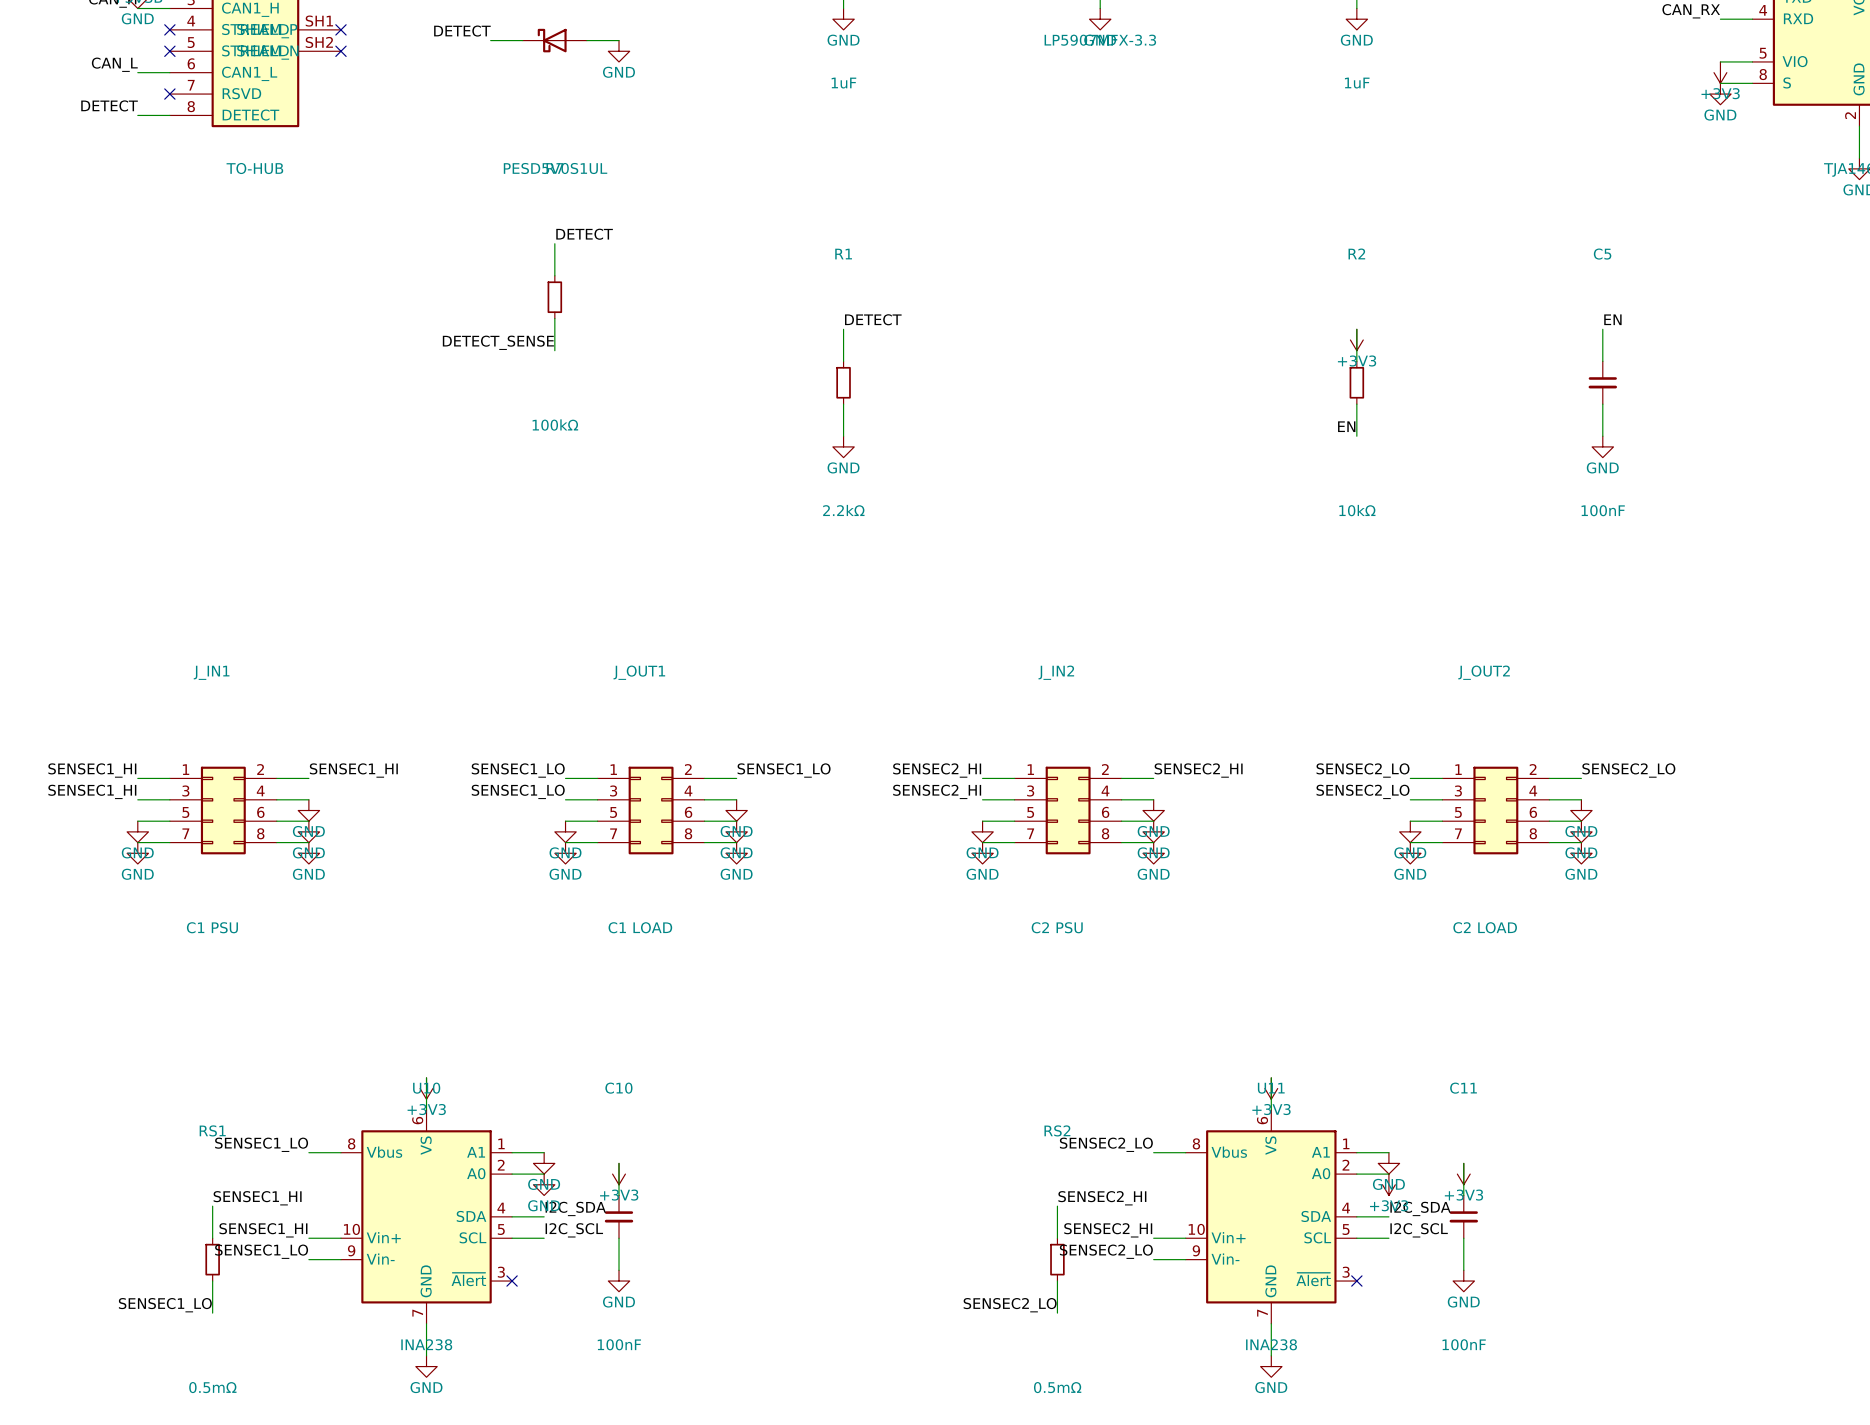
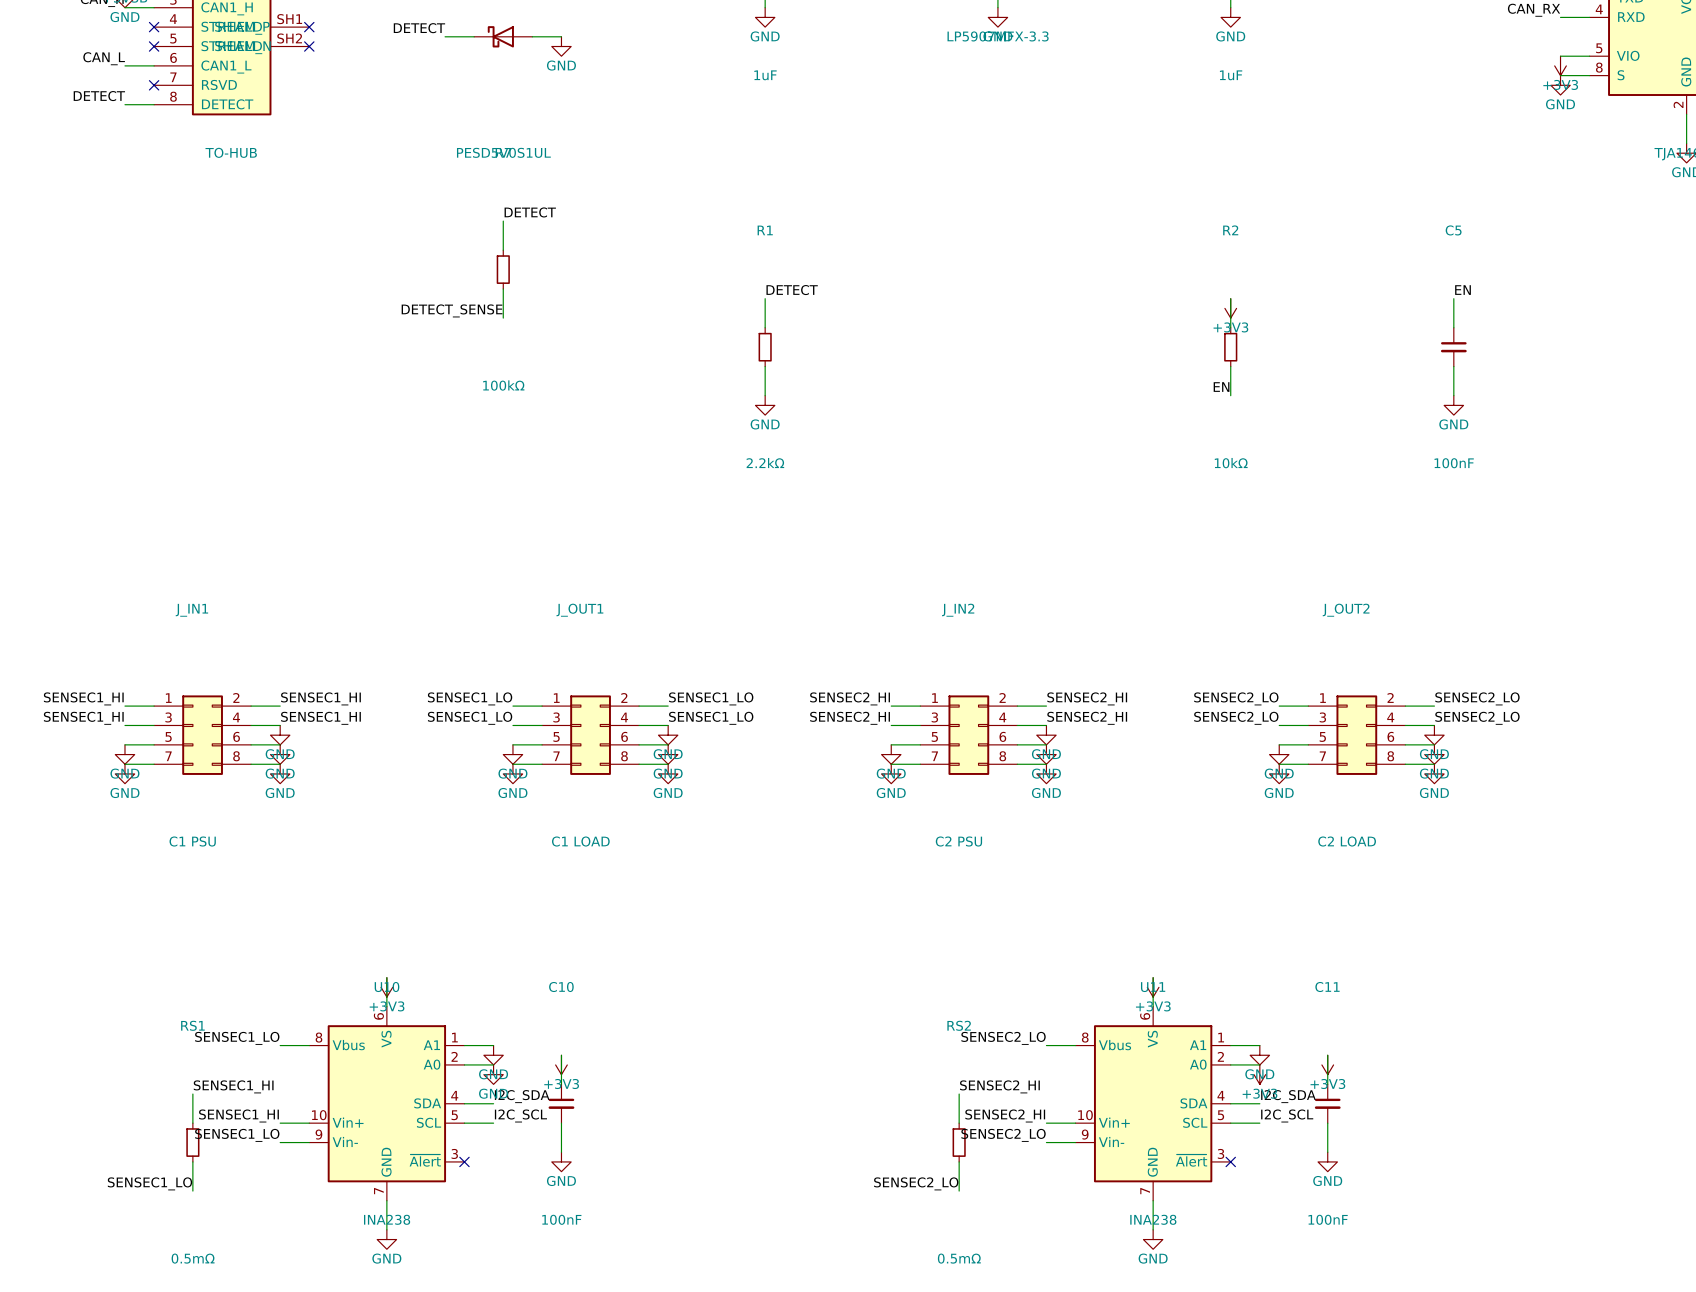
label: none -> SENSEC1_HI (320, 718)
label: none -> SENSEC1_LO (711, 718)
label: none -> SENSEC2_HI (1087, 718)
label: none -> SENSEC2_LO (1477, 718)

